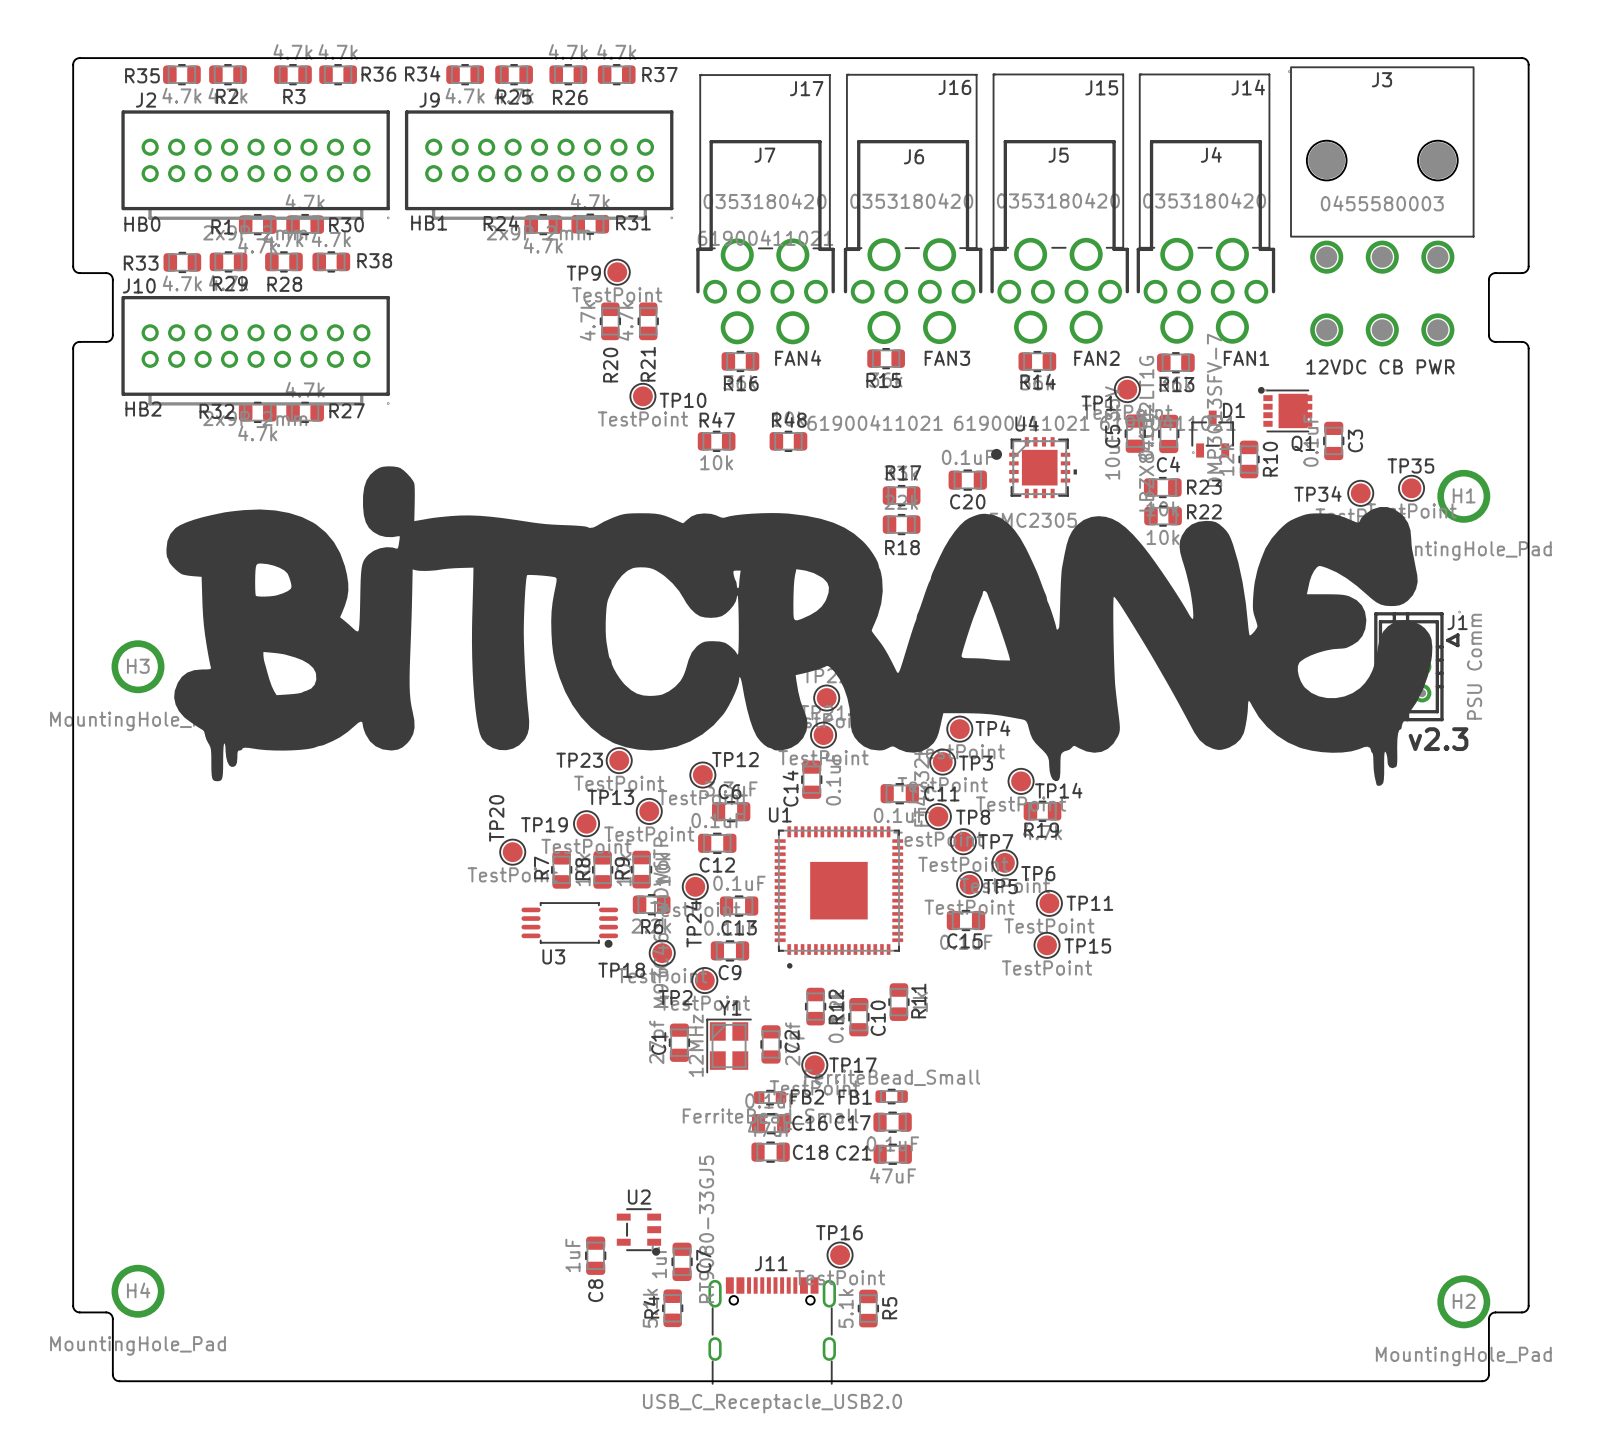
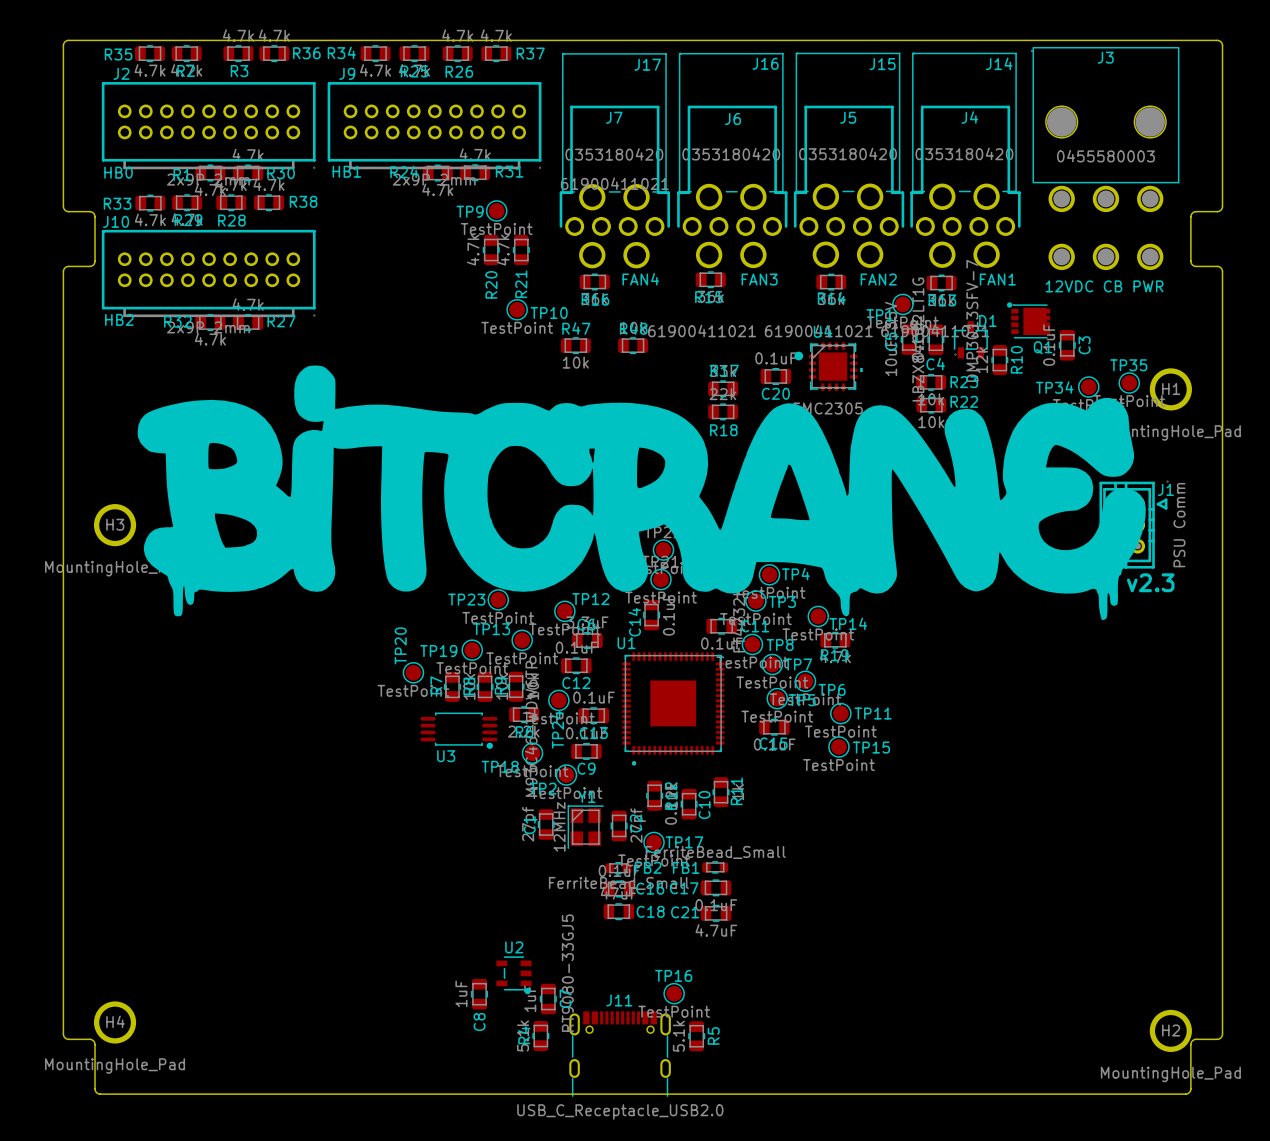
C21 value: 47uF (893, 1175) -> 4.7uF (716, 930)

